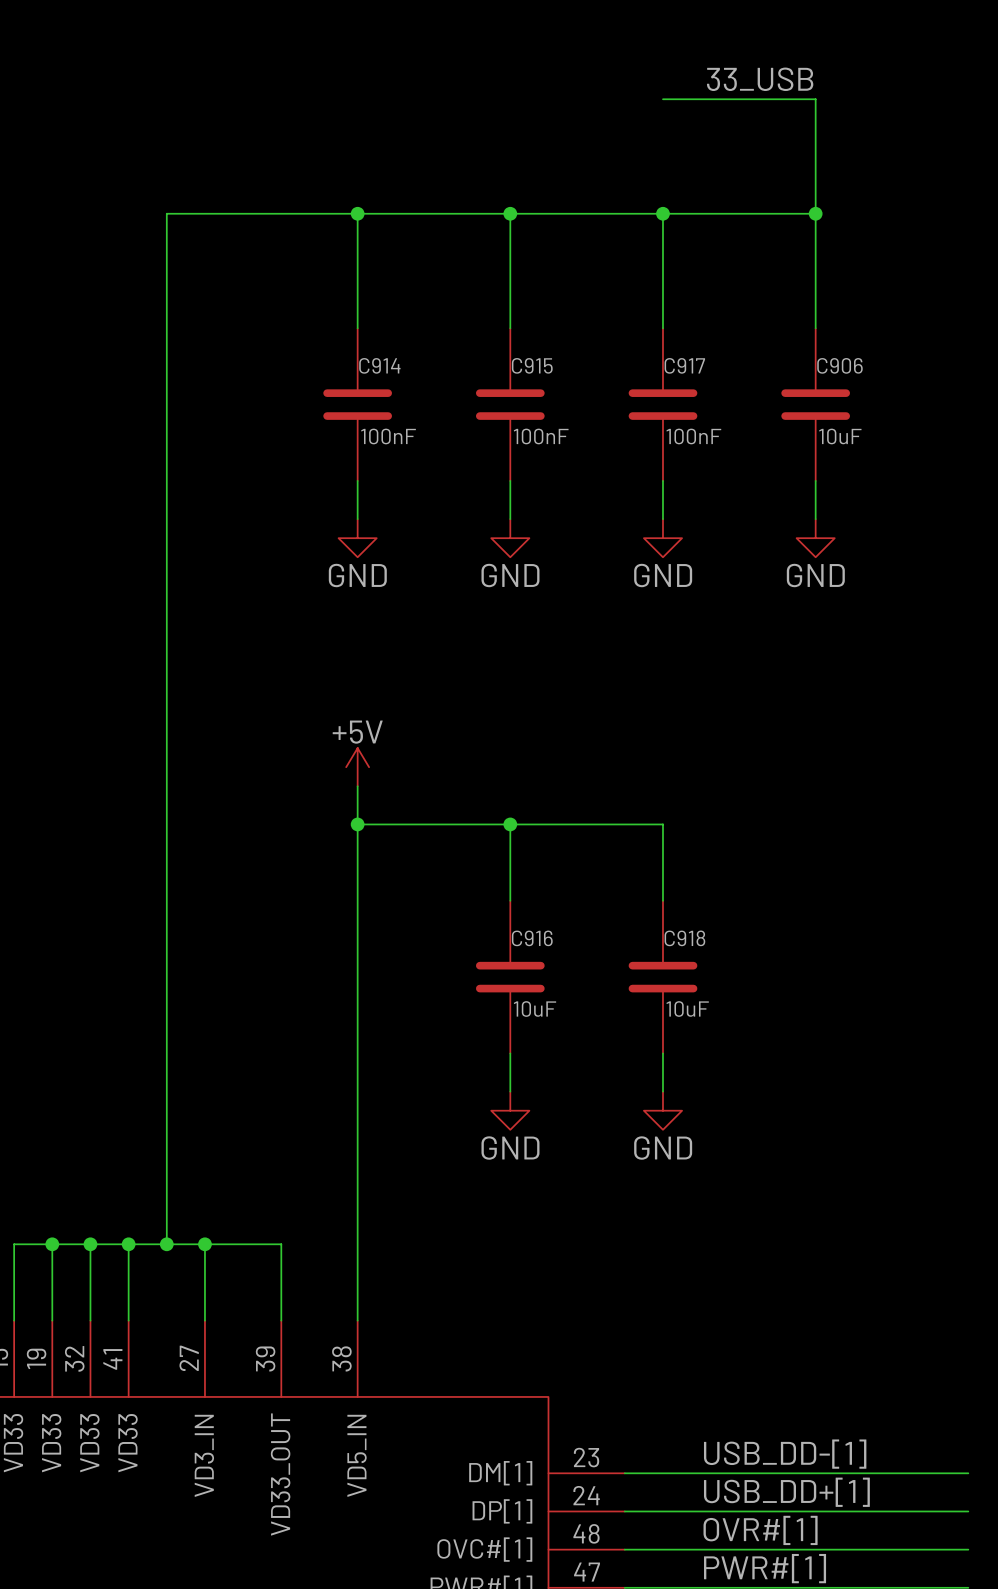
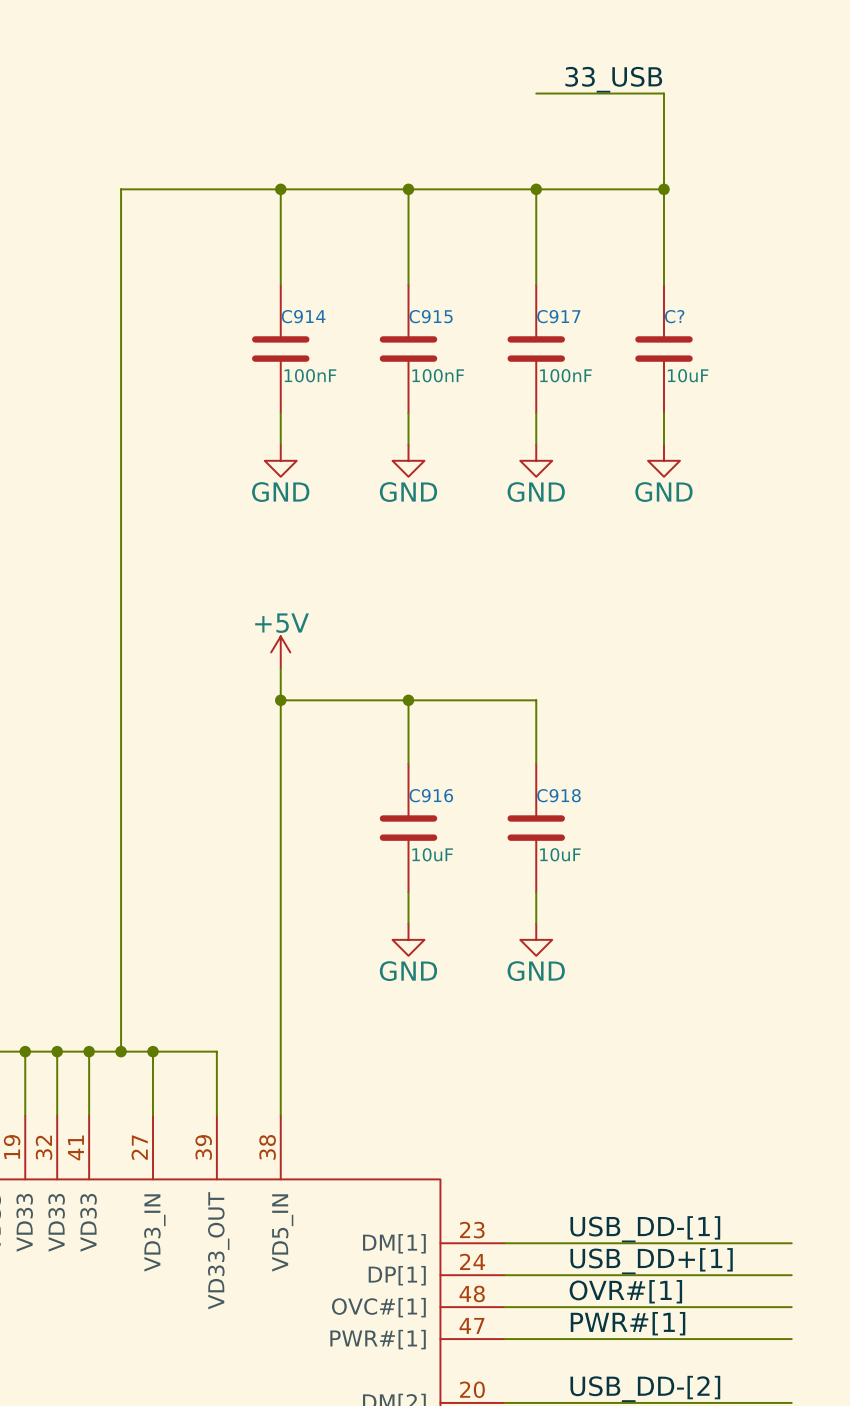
C906 name: C906 (839, 365) -> C? (674, 316)

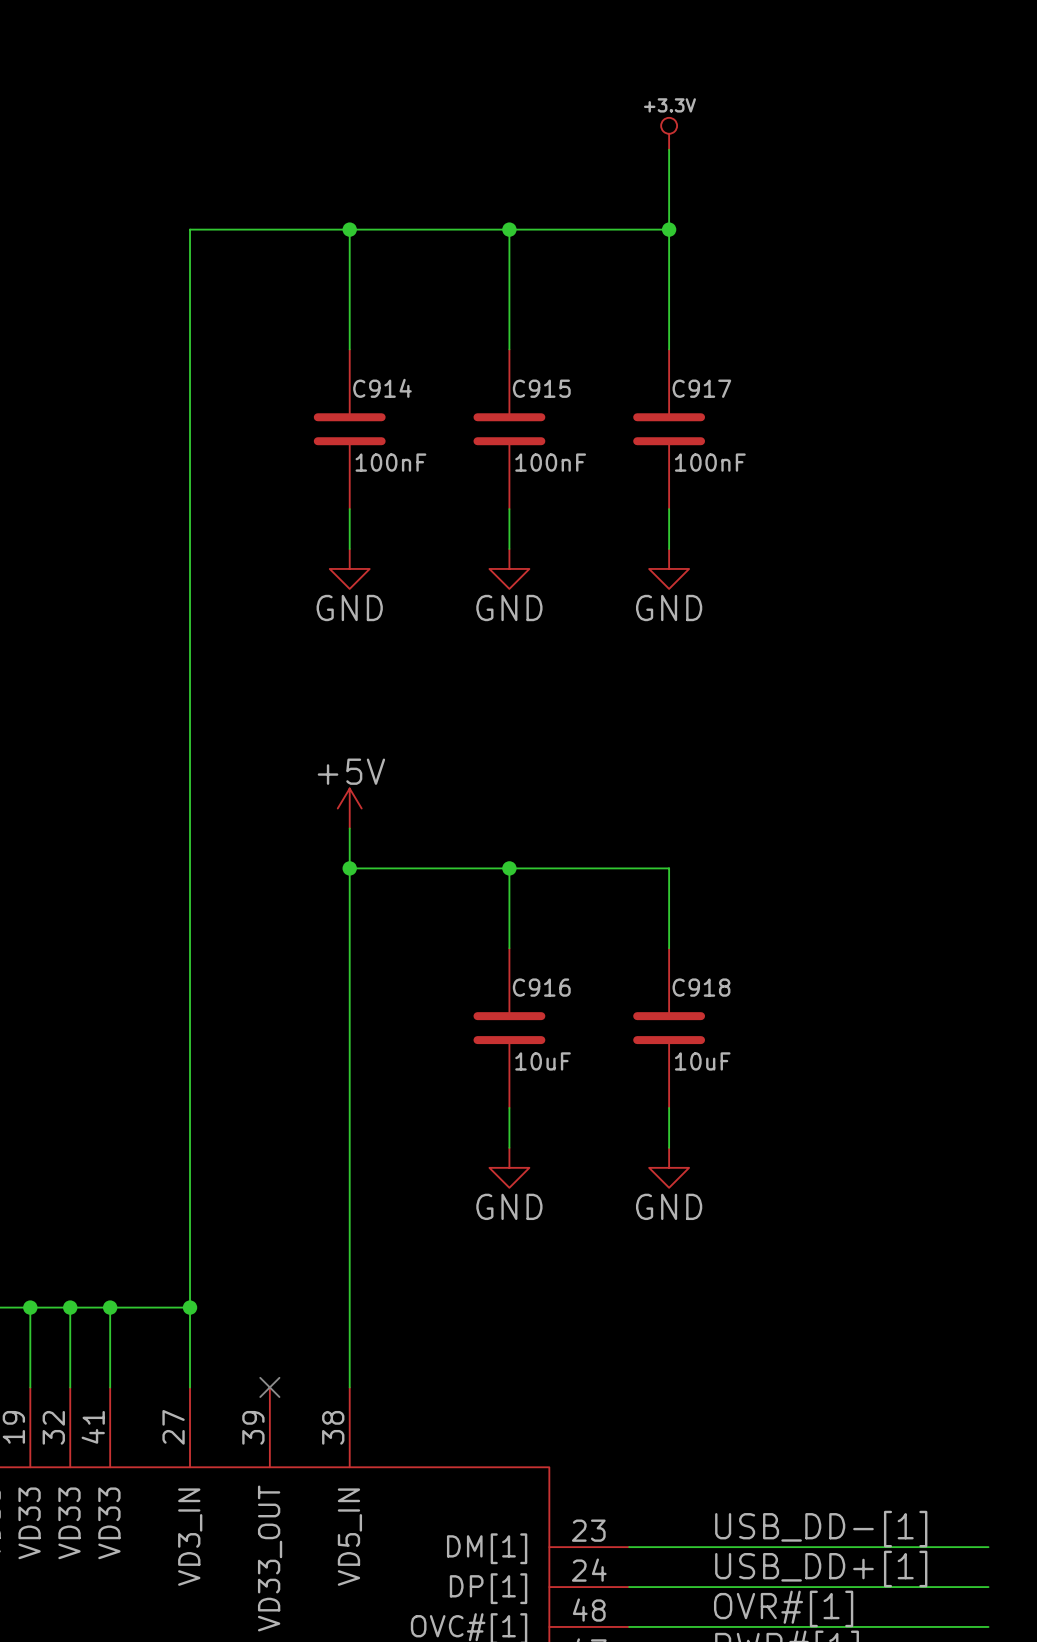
label: 33_USB (613, 79) -> none
wire: (536, 93) (664, 93) (664, 285) -> none
power symbol: none -> +3.3V (669, 133)
wire: (153, 189) (121, 189) (121, 1051) -> (190, 229) (190, 1307)
wire: (536, 189) (664, 189) -> (669, 229) (669, 149)
junction: (664, 189) -> none
C?: 10uF (664, 349) -> none
wire: (664, 412) (664, 444) -> none
power symbol: GND (664, 460) -> none
junction: (121, 1051) -> none
wire: (153, 1051) (216, 1051) (216, 1115) -> none
no-connect mark: none -> (269, 1387)

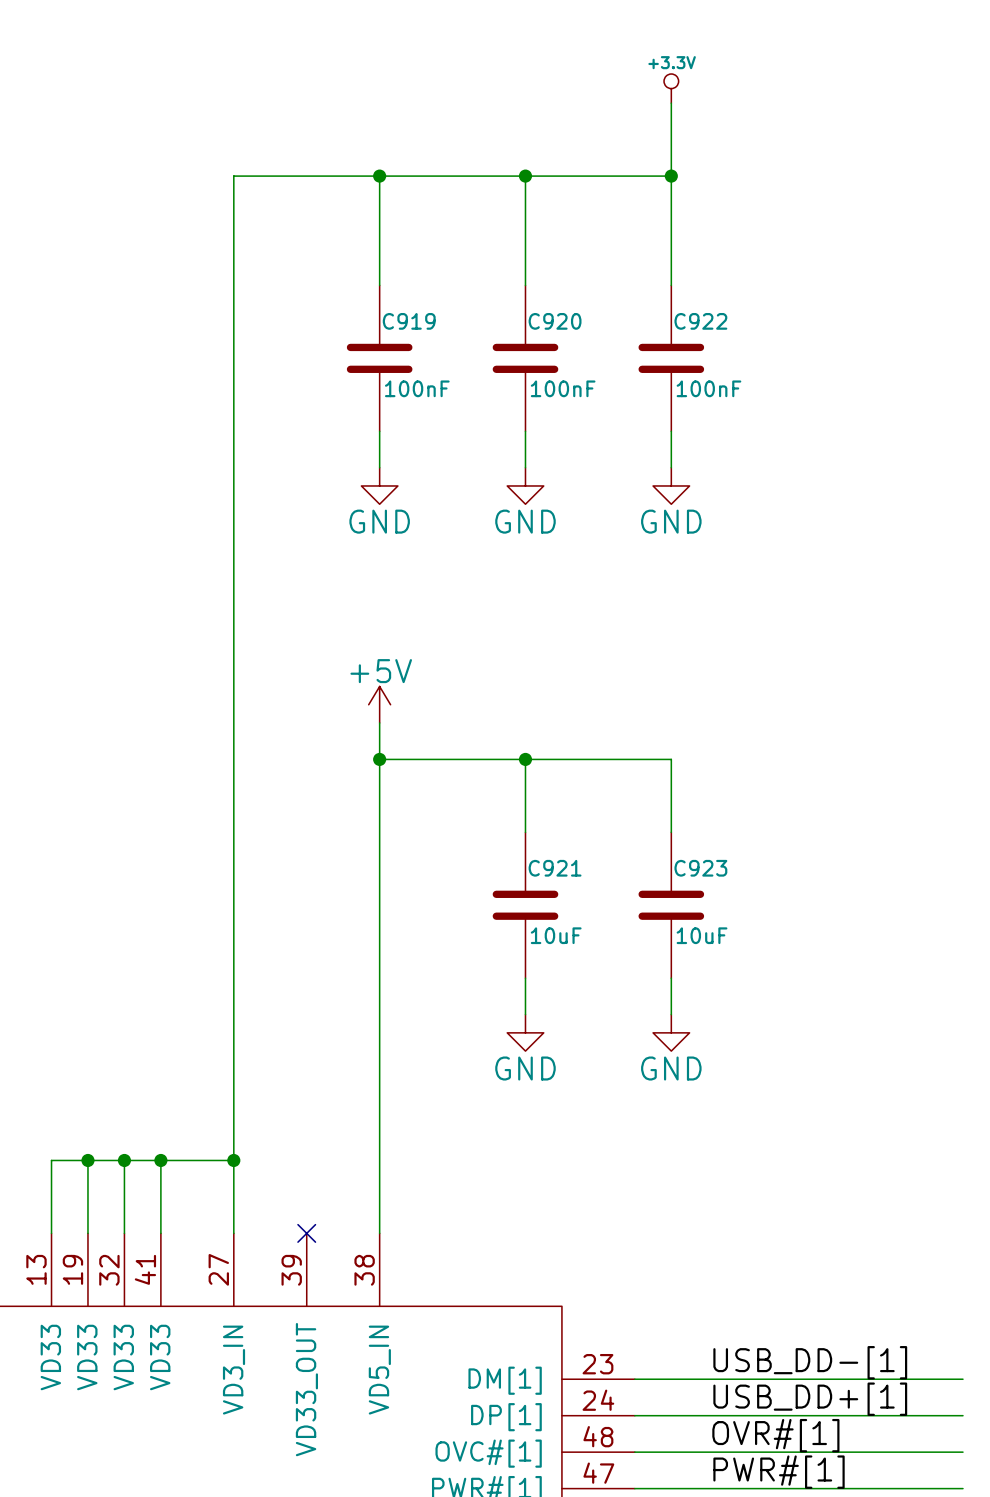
C914 name: C914 (382, 388) -> C919 (409, 321)
C915 name: C915 (541, 388) -> C920 (555, 321)
C917 name: C917 (701, 388) -> C922 (700, 321)
C916 name: C916 (541, 987) -> C921 (555, 868)
C918 name: C918 (701, 987) -> C923 (700, 868)

